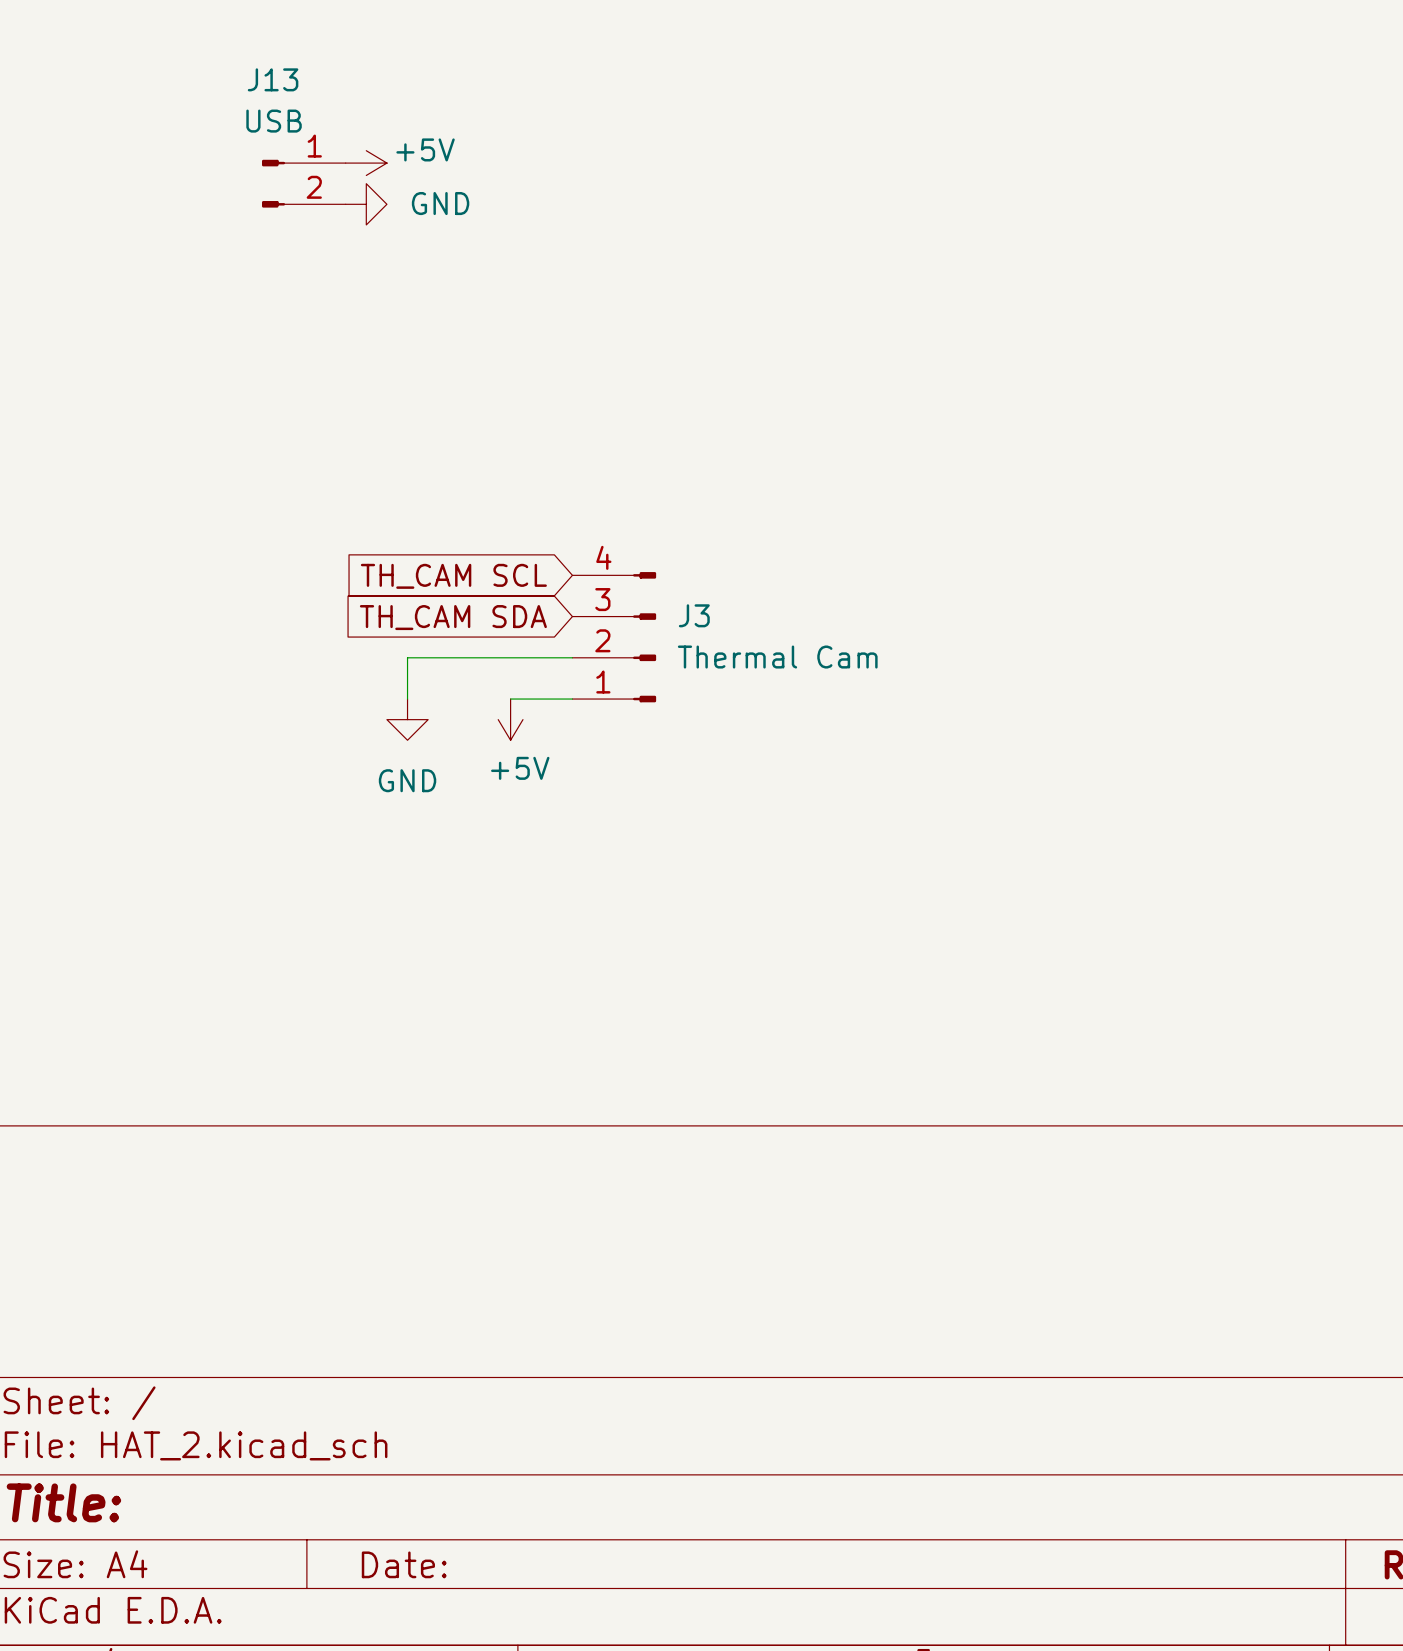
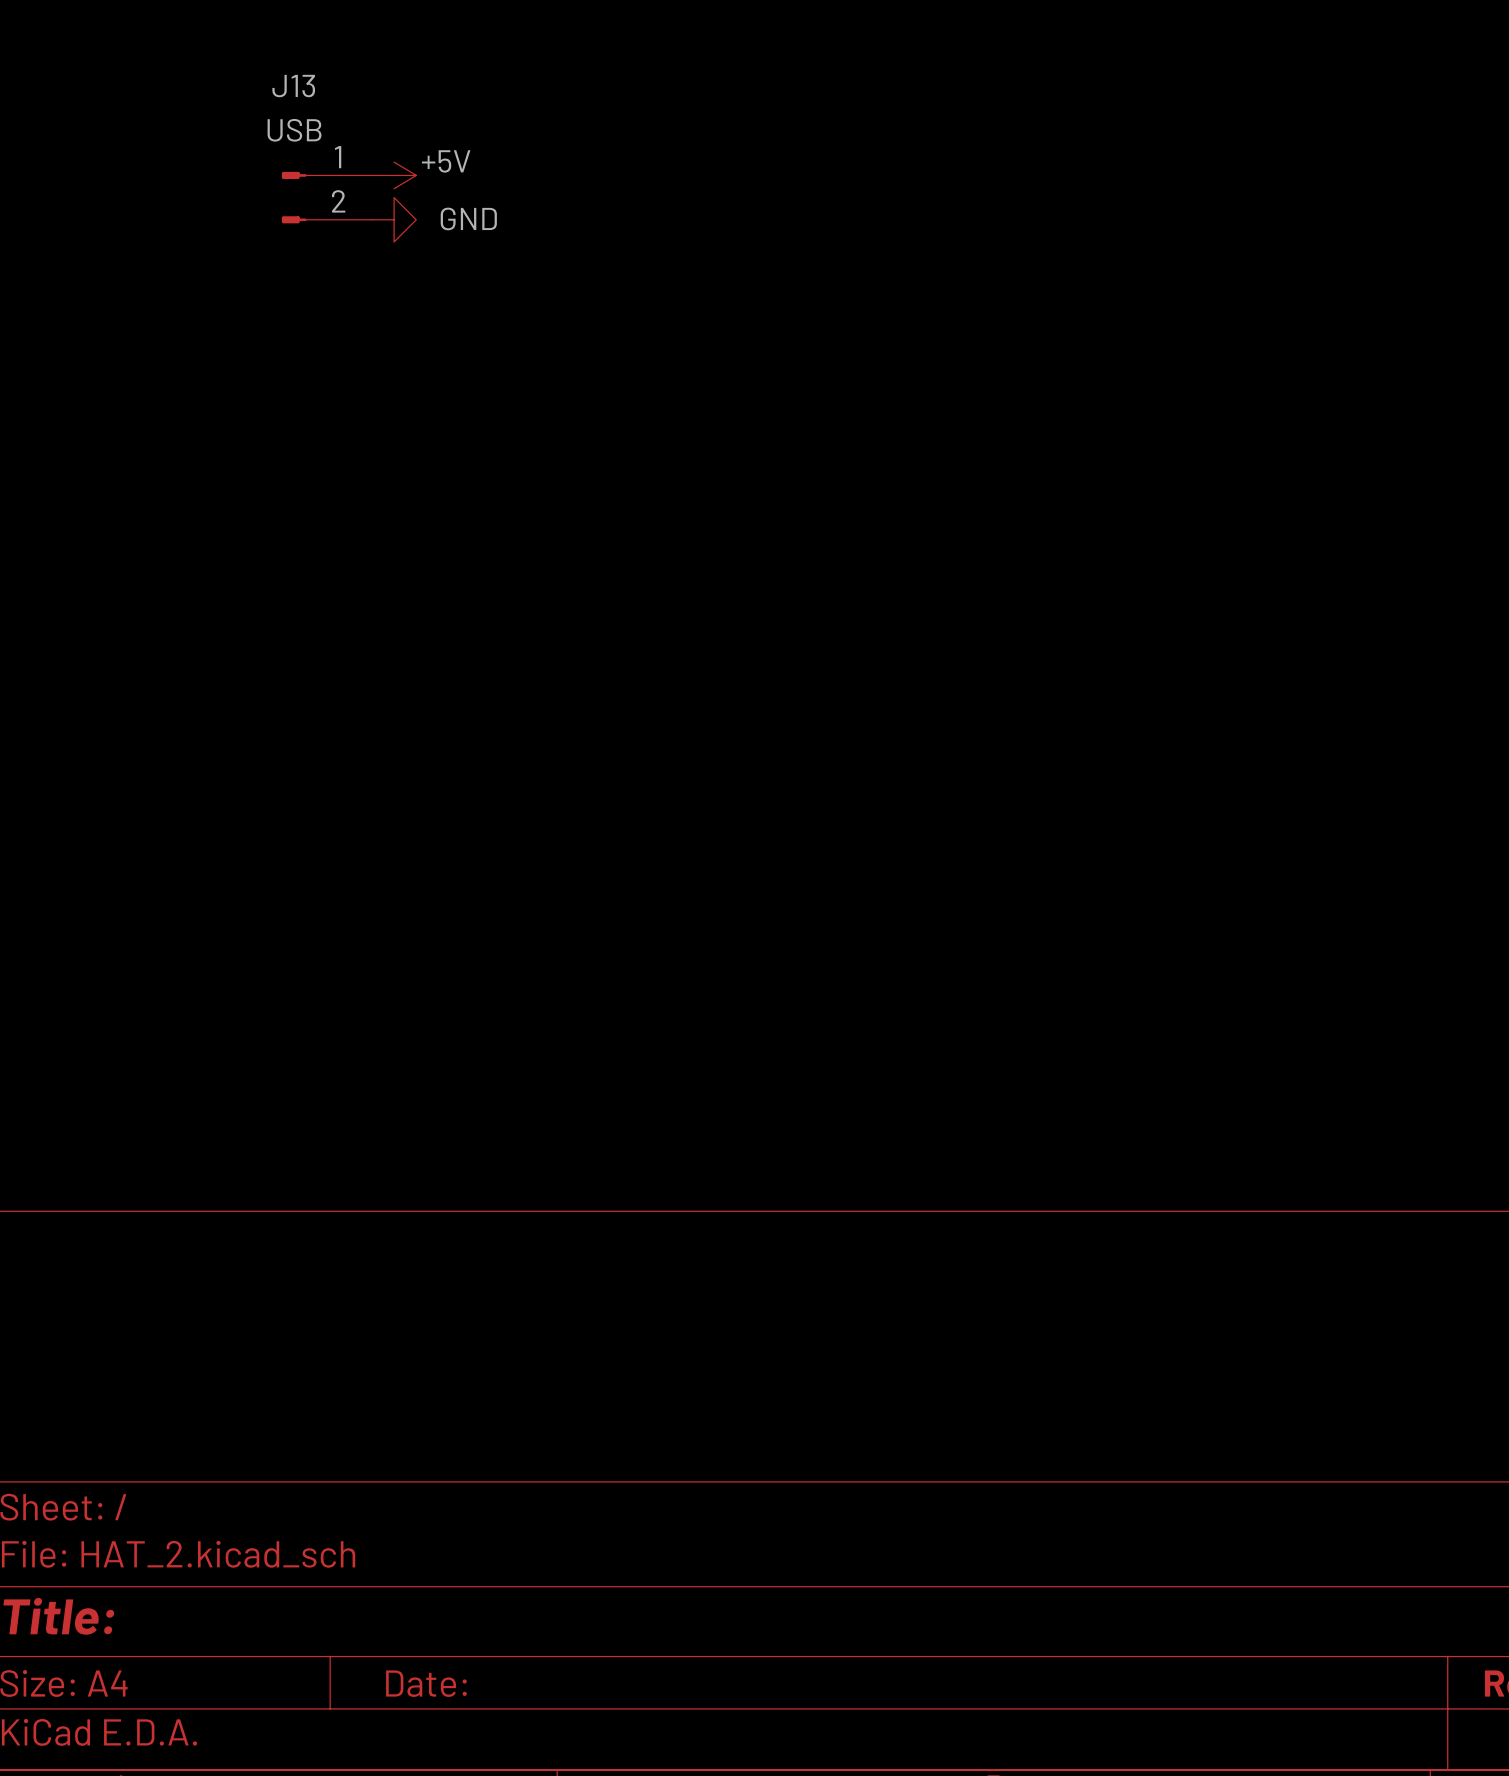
global label: TH_CAM SCL (453, 576) -> none
global label: TH_CAM SDA (453, 617) -> none
J3: Thermal Cam (614, 637) -> none
wire: (572, 657) (407, 657) (407, 699) -> none
wire: (510, 699) (572, 699) -> none
power symbol: GND (407, 719) -> none
power symbol: +5V (510, 719) -> none

